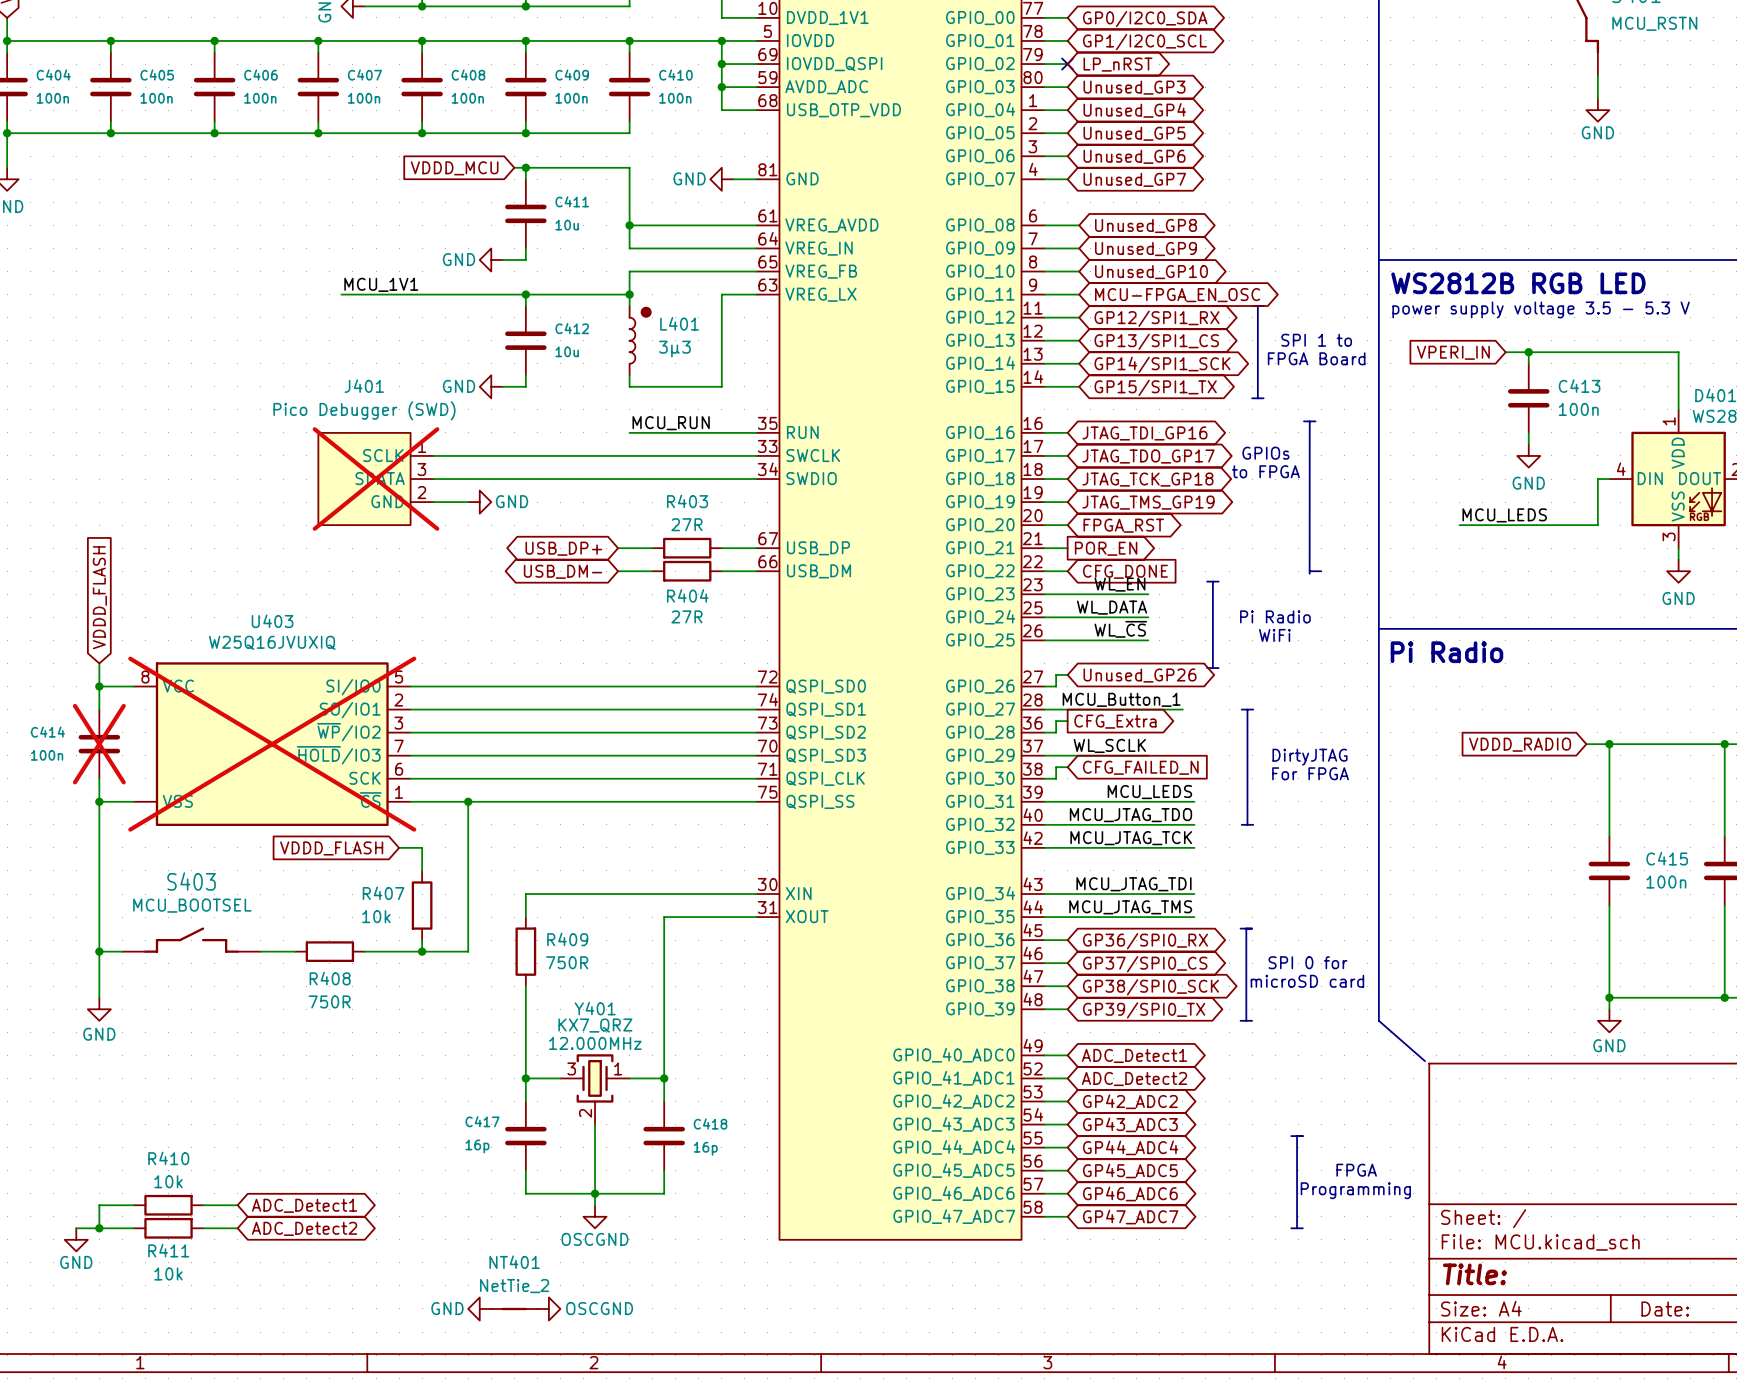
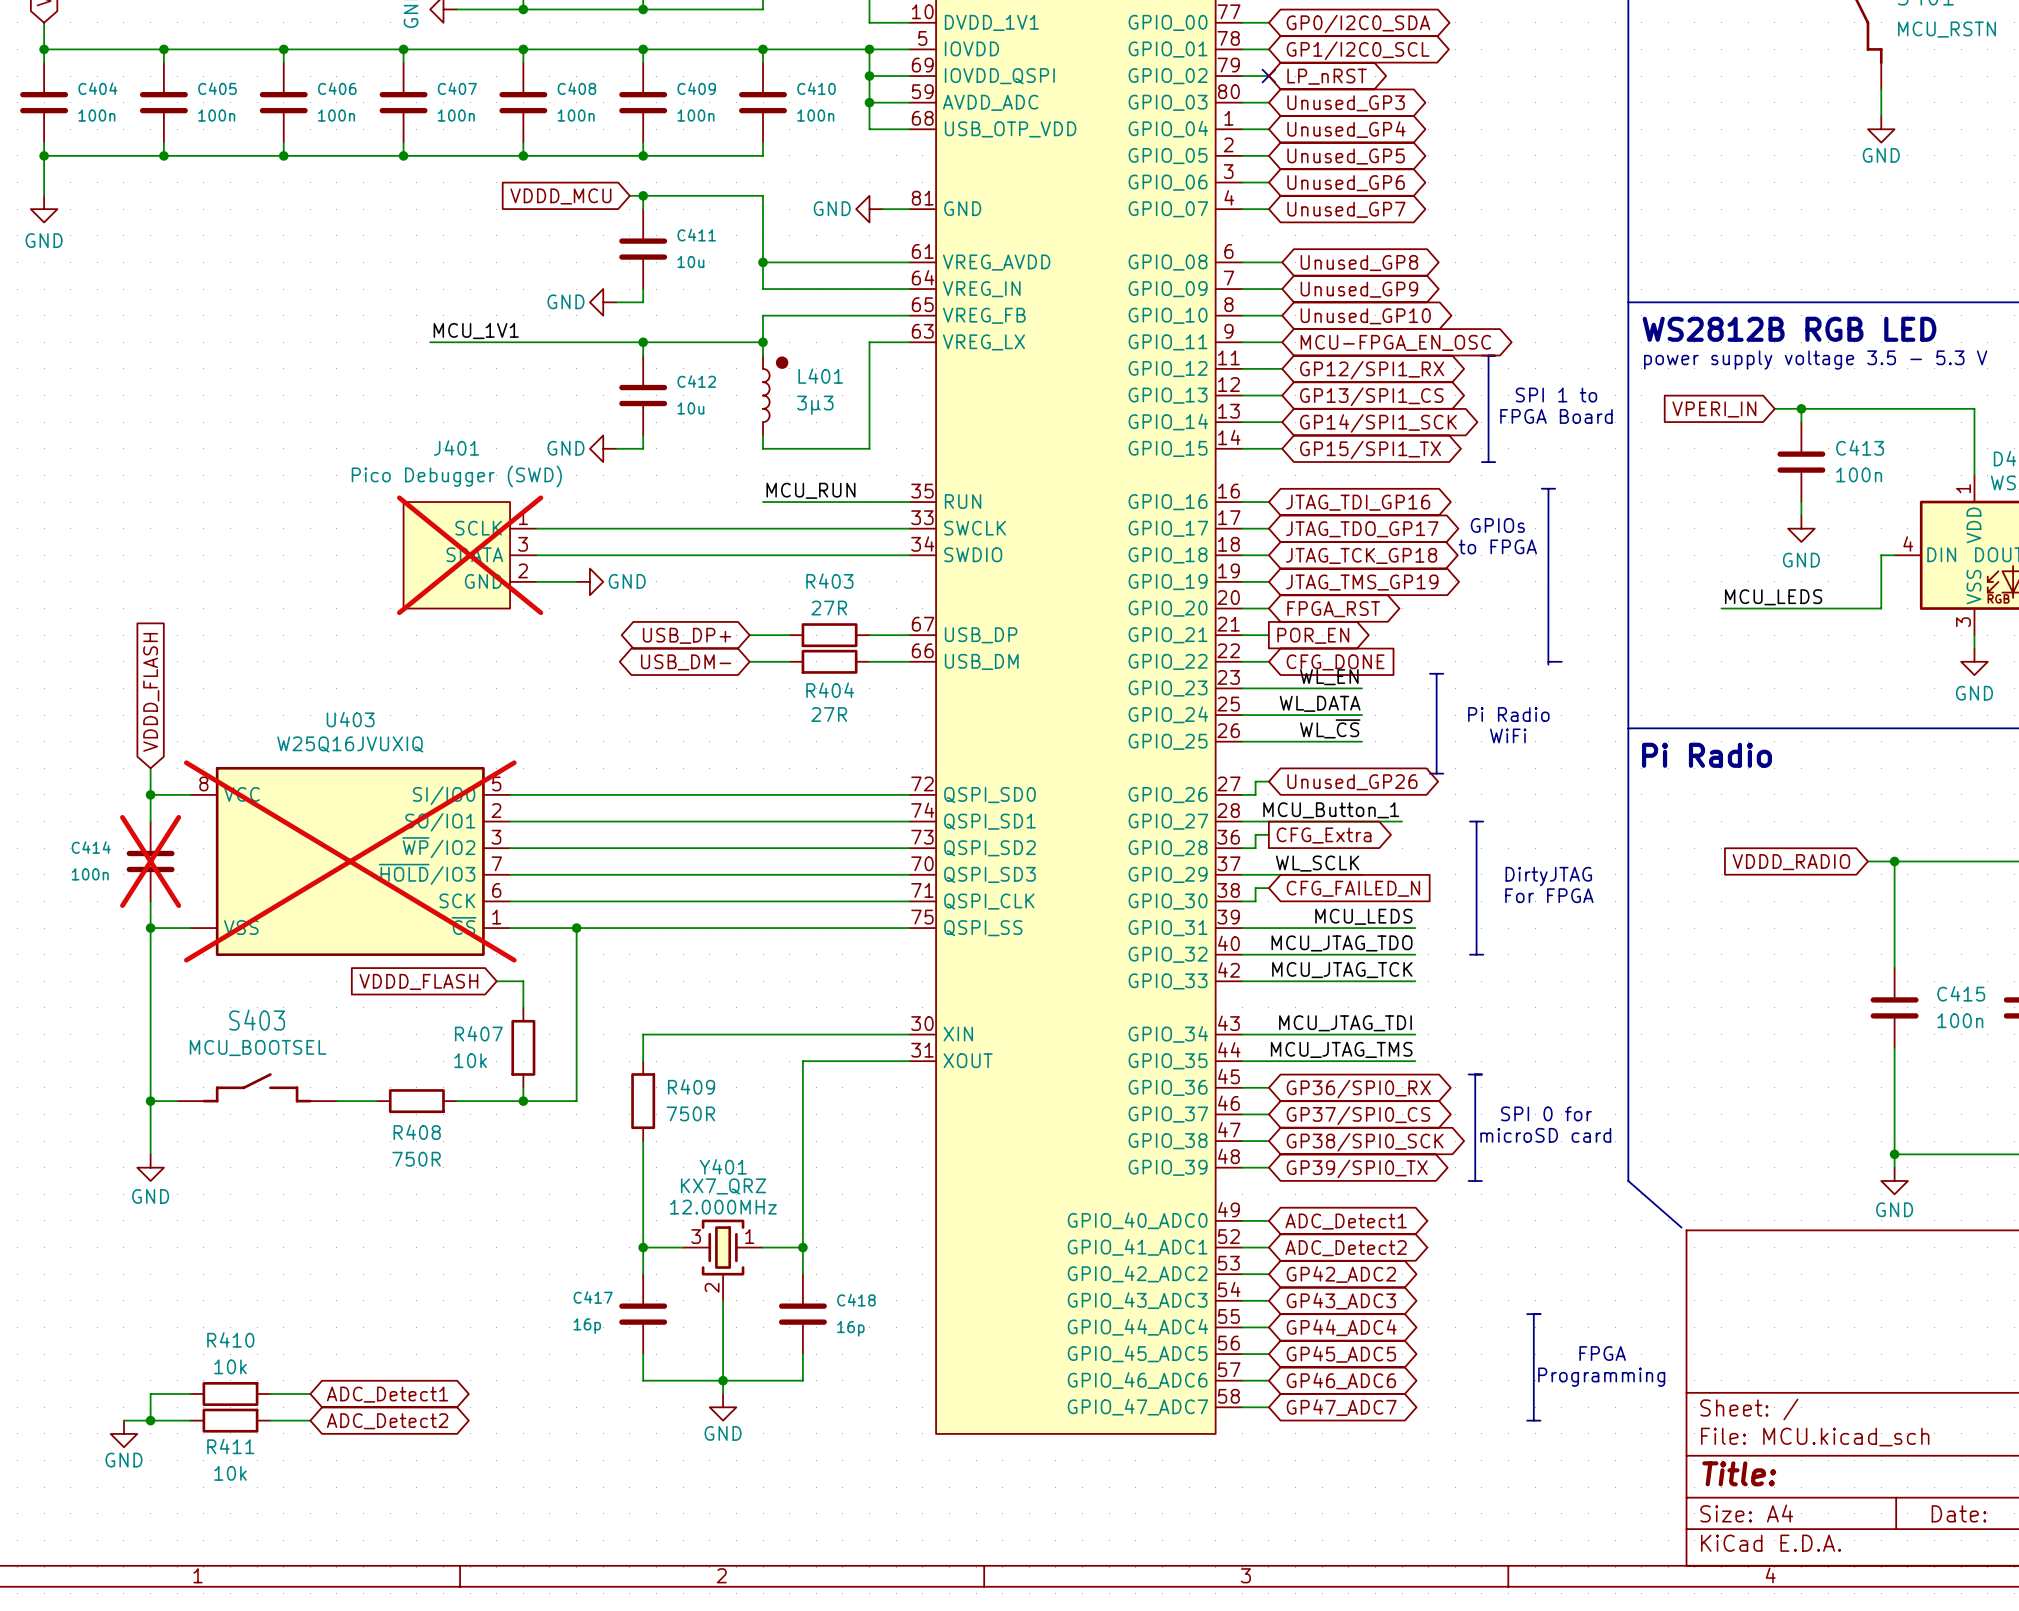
power symbol: OSCGND (595, 1216) -> GND (723, 1407)
power symbol: GND (479, 1308) -> none
NT401: NetTie_2 (514, 1308) -> none
power symbol: OSCGND (548, 1308) -> none

